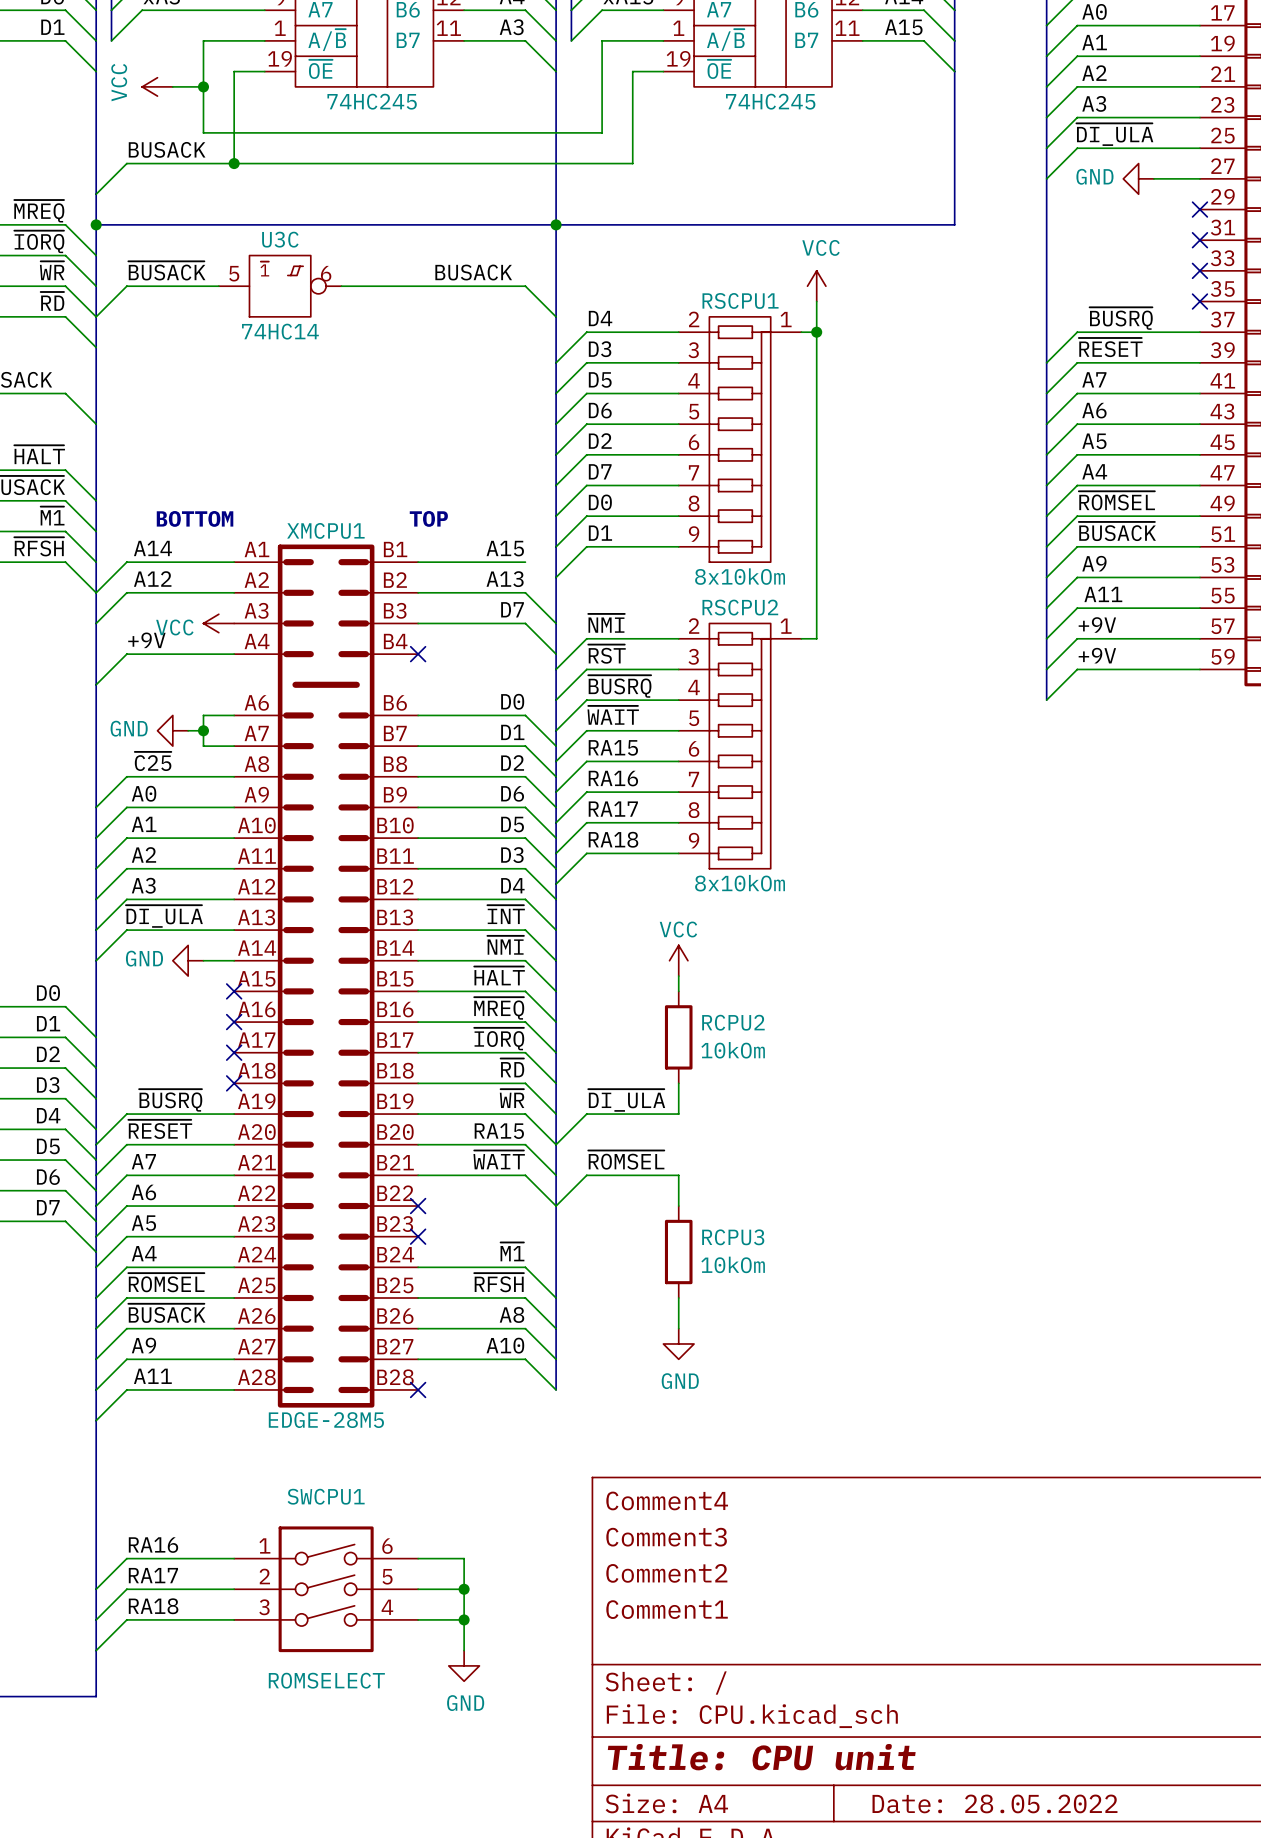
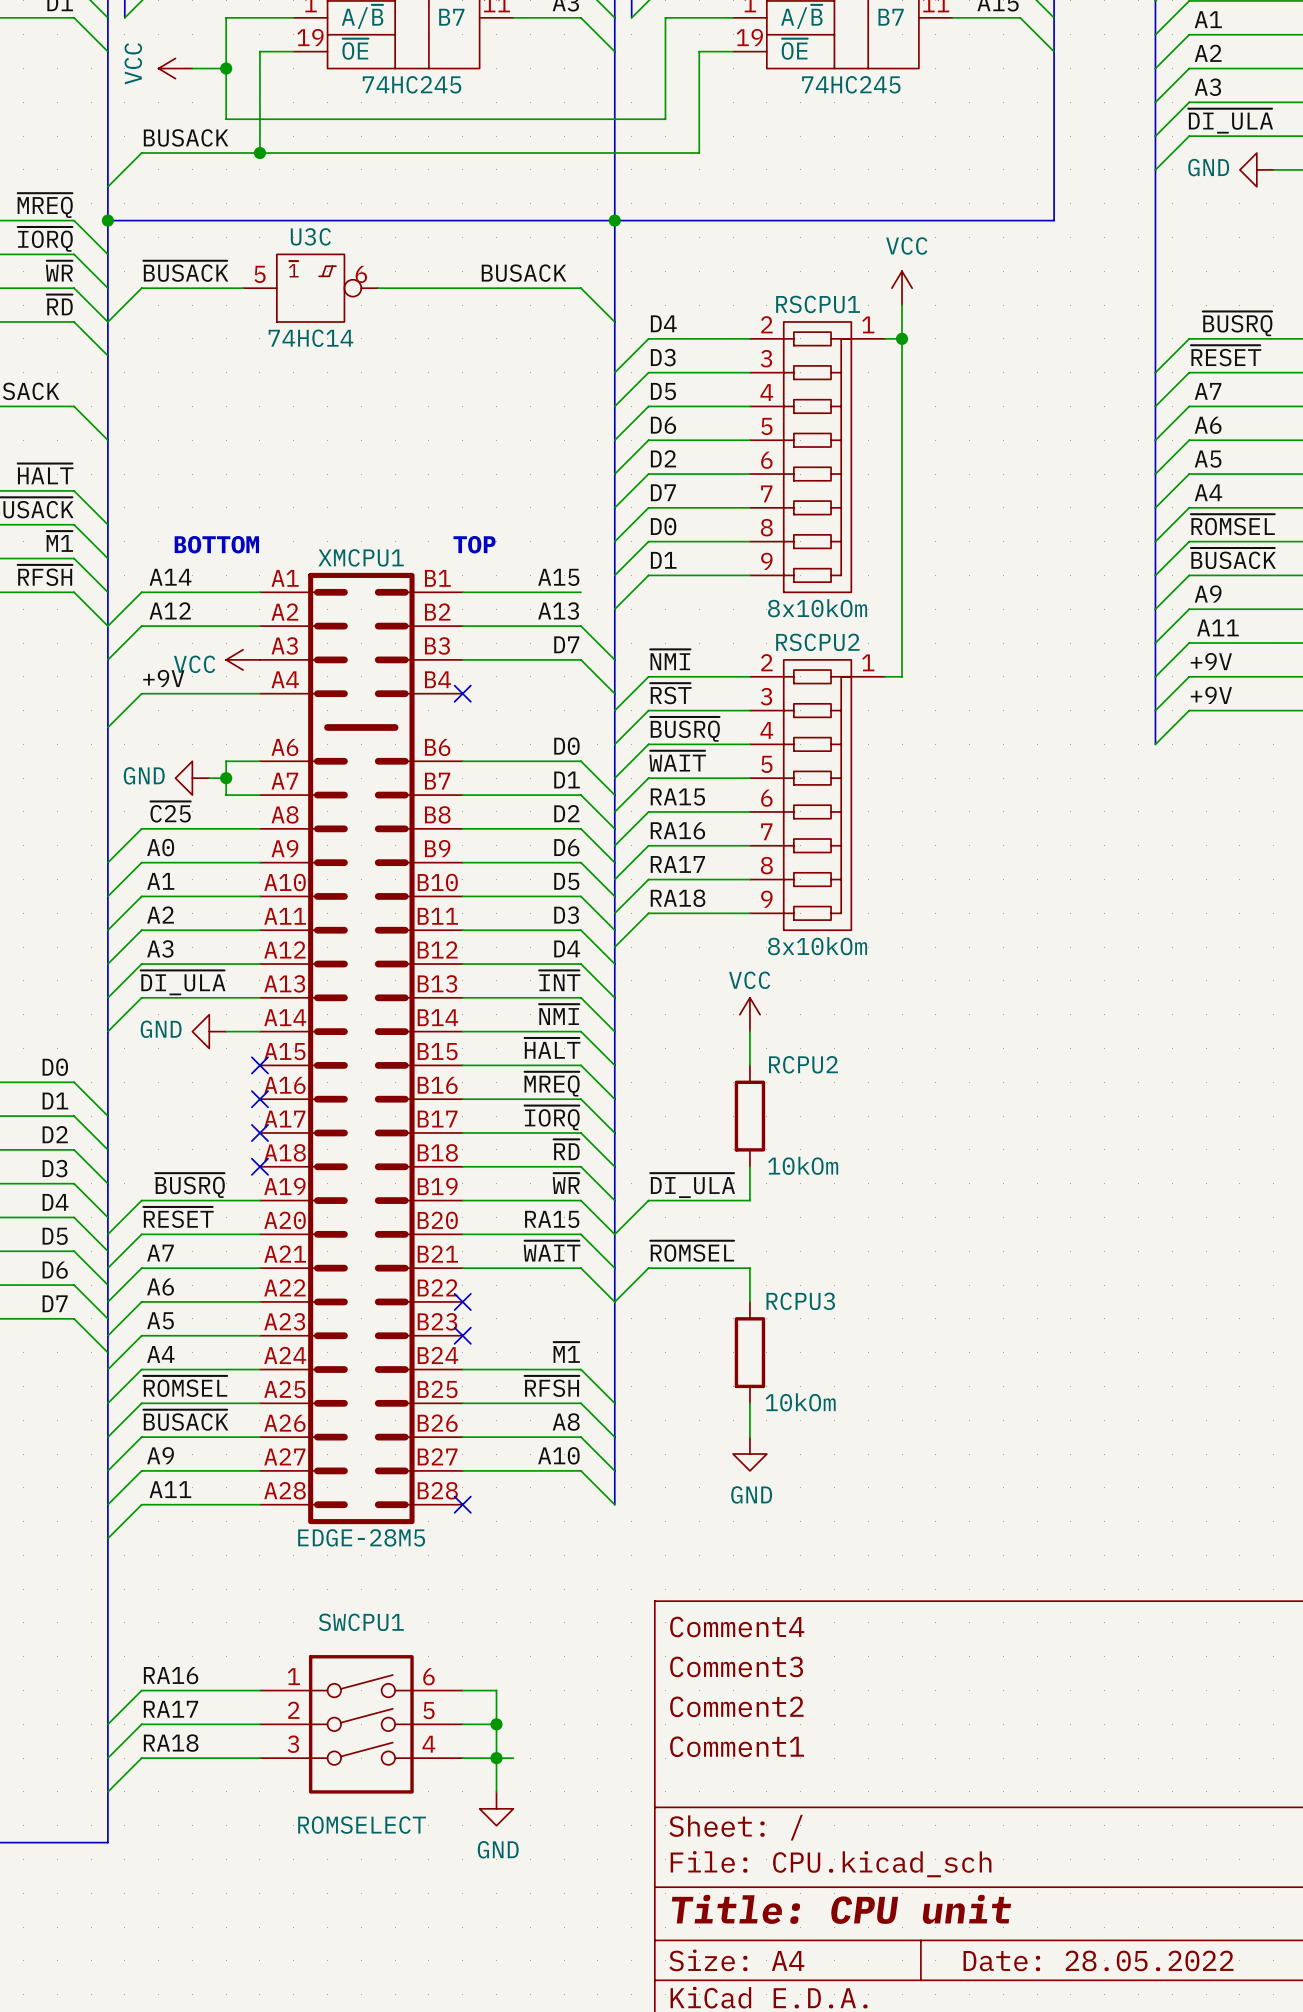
power symbol position: VCC (678, 960) -> VCC (749, 1014)
RCPU2 name position: RCPU2 (733, 1022) -> RCPU2 (803, 1064)
RCPU2 value position: 10kOm (733, 1050) -> 10kOm (803, 1165)
RCPU3 name position: RCPU3 (733, 1237) -> RCPU3 (800, 1301)
RCPU3 value position: 10kOm (733, 1264) -> 10kOm (800, 1402)
wire: (448, 1558) (464, 1558) (464, 1650) -> (496, 1690) (496, 1791)
wire: (448, 1589) (464, 1589) -> none
junction position: (464, 1589) -> (496, 1724)
junction position: (464, 1619) -> (496, 1758)
power symbol position: GND (464, 1665) -> GND (496, 1808)

